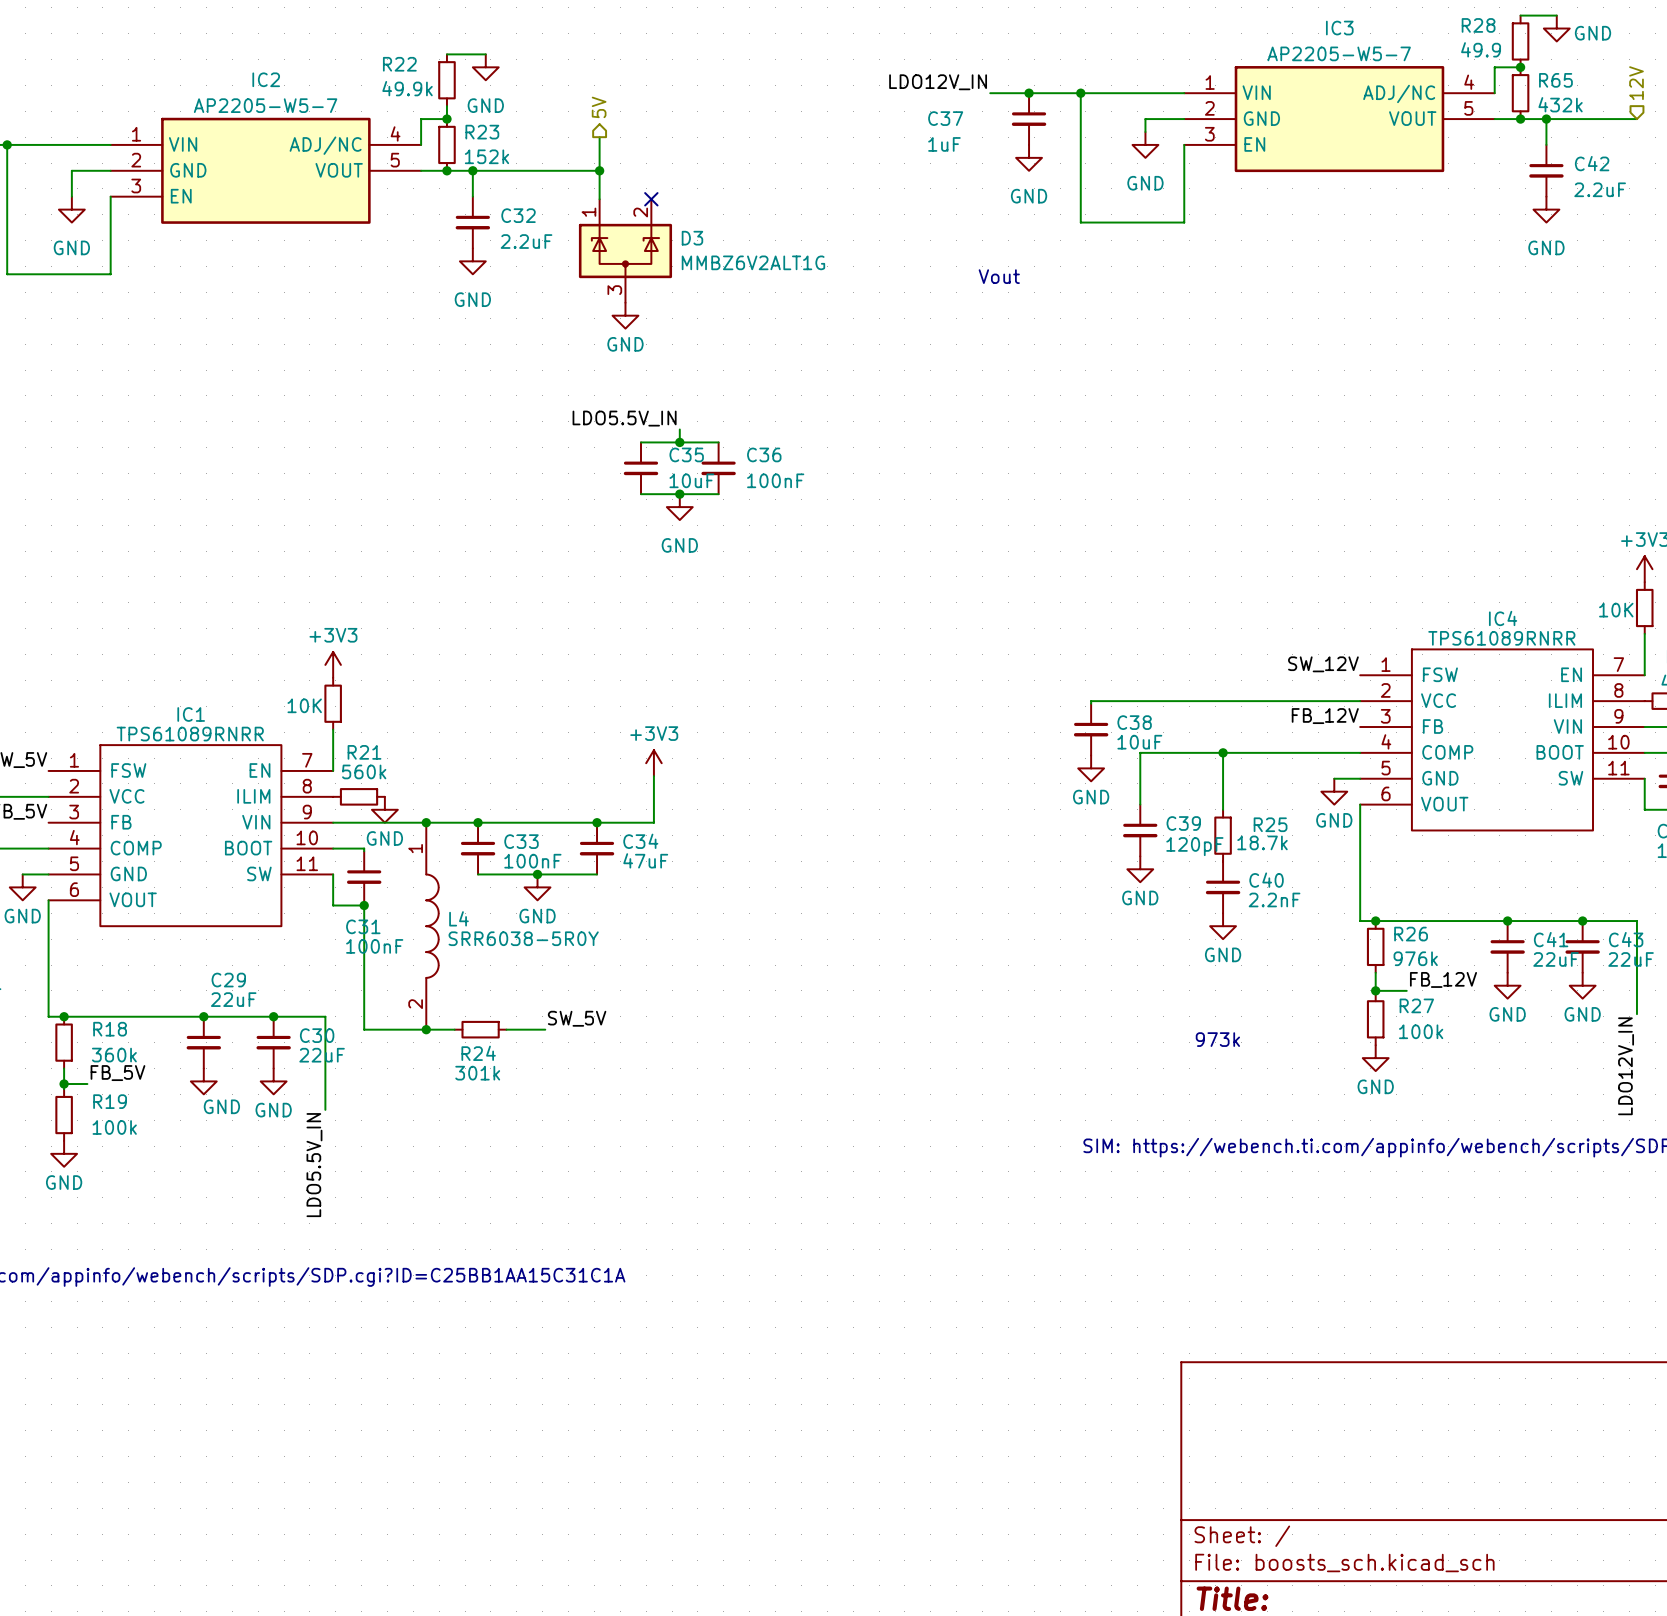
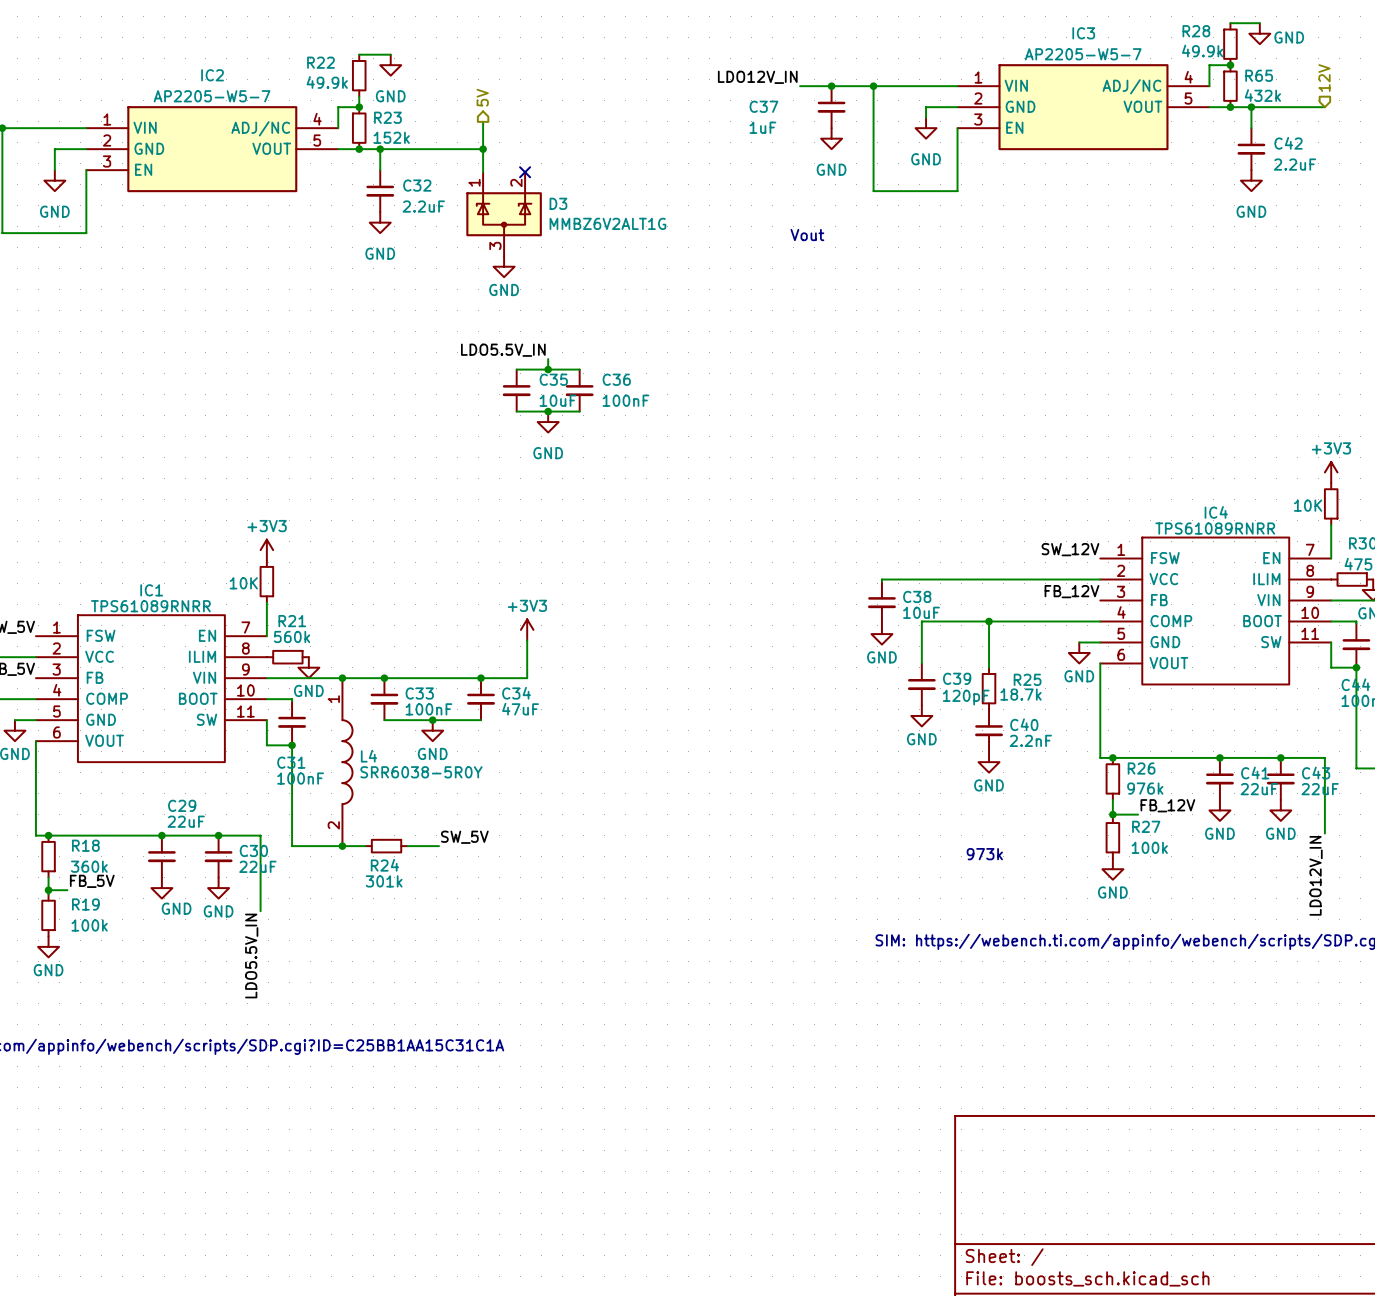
R28 value: 49.9 (1481, 49) -> 49.9k (1202, 50)

